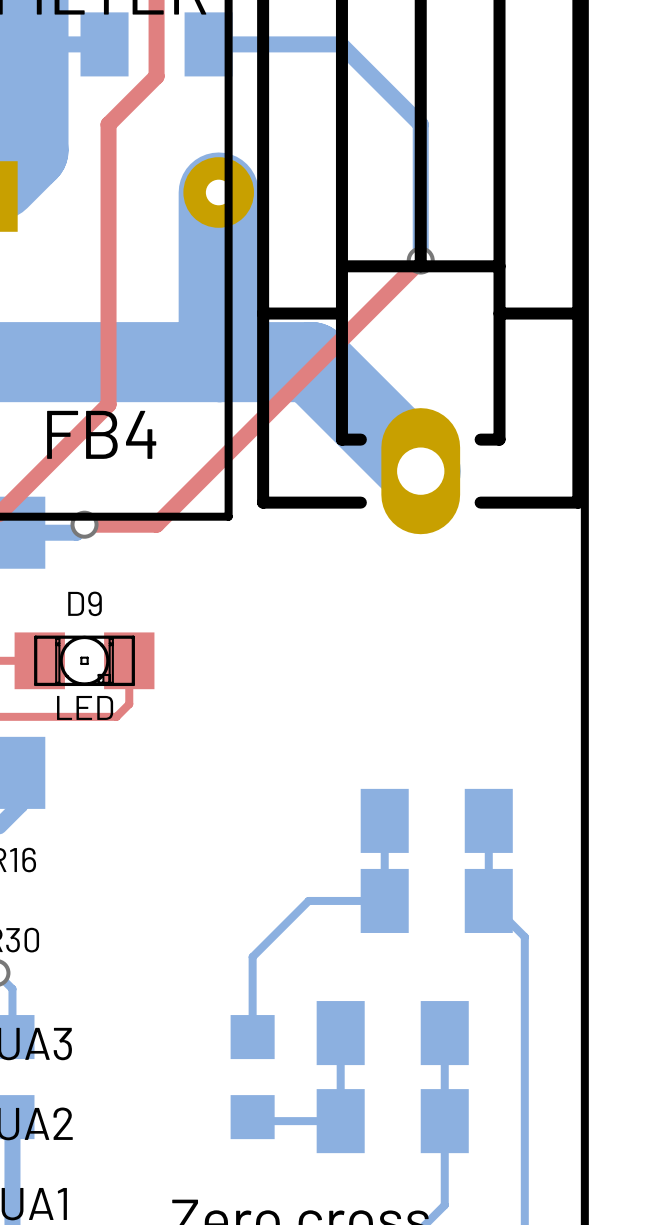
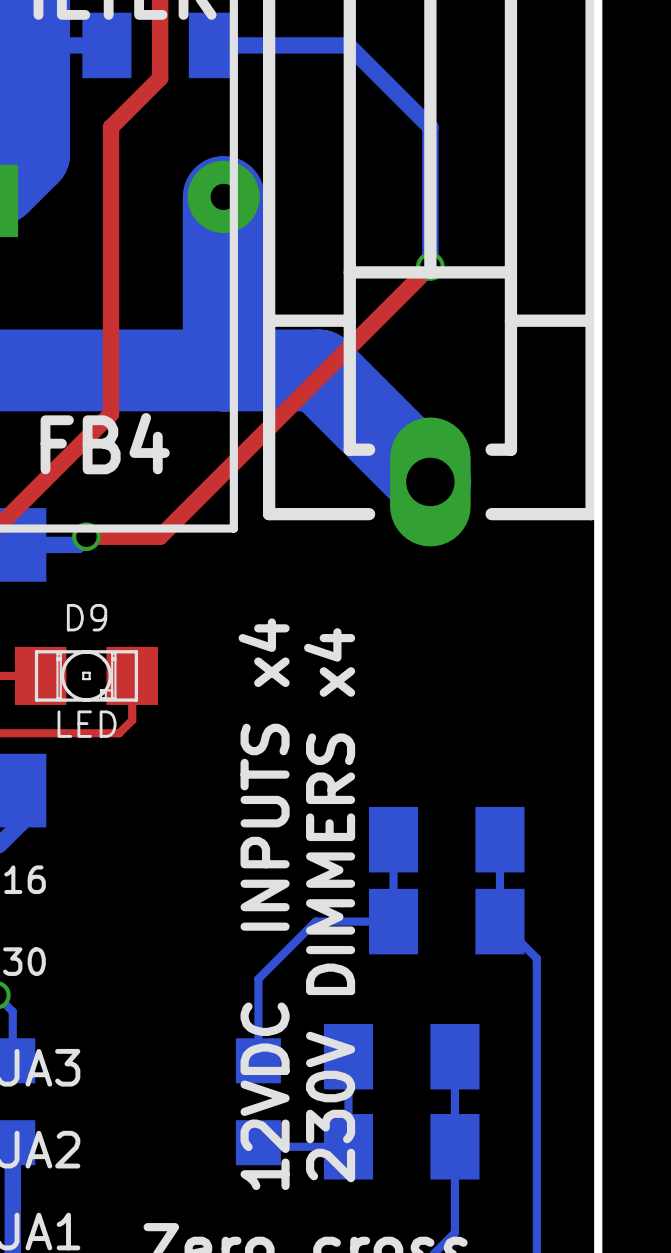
text: none -> 12VDC INPUTS x4 (264, 904)
text: none -> 230V DIMMERS x4 (329, 905)

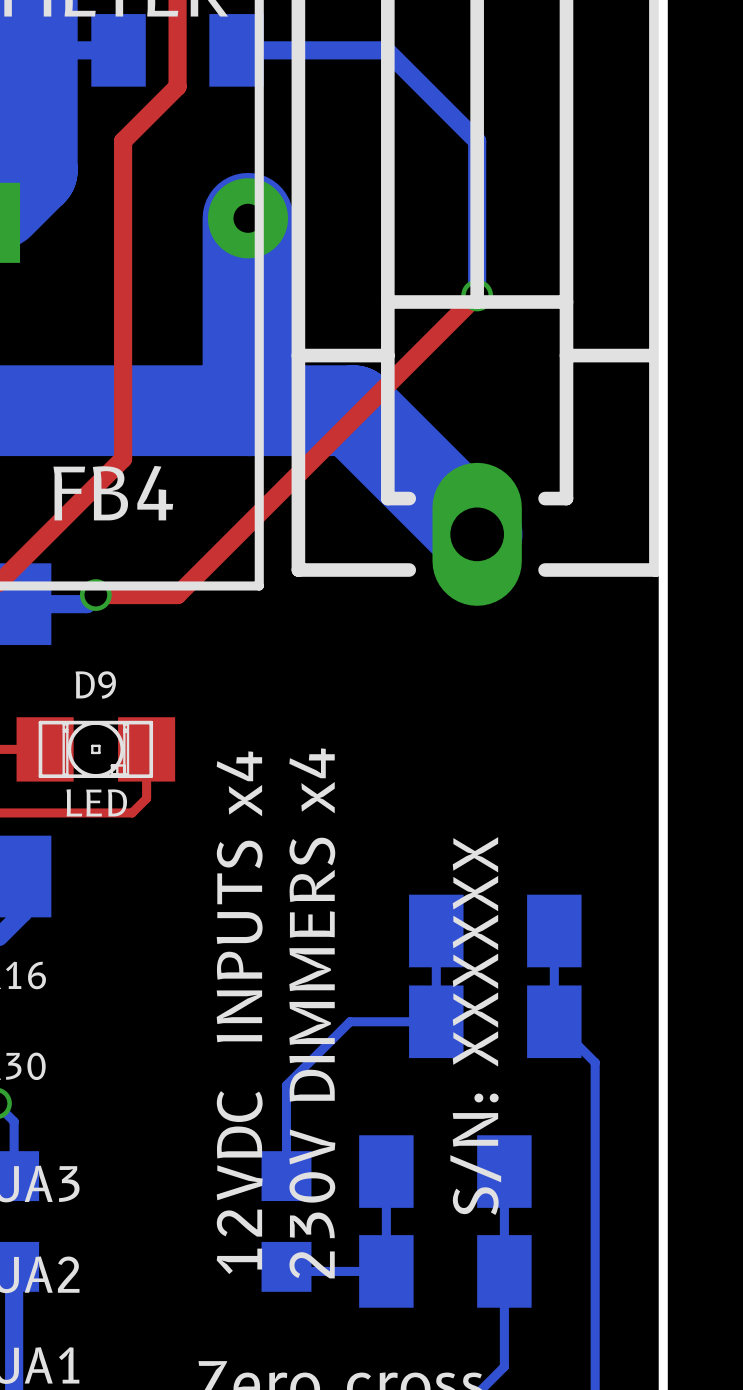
text position: 12VDC INPUTS x4 (264, 904) -> 12VDC INPUTS x4 (239, 1012)
text position: 230V DIMMERS x4 (329, 905) -> 230V DIMMERS x4 (312, 1013)
text: none -> S/N: XXXXXX (475, 1026)

